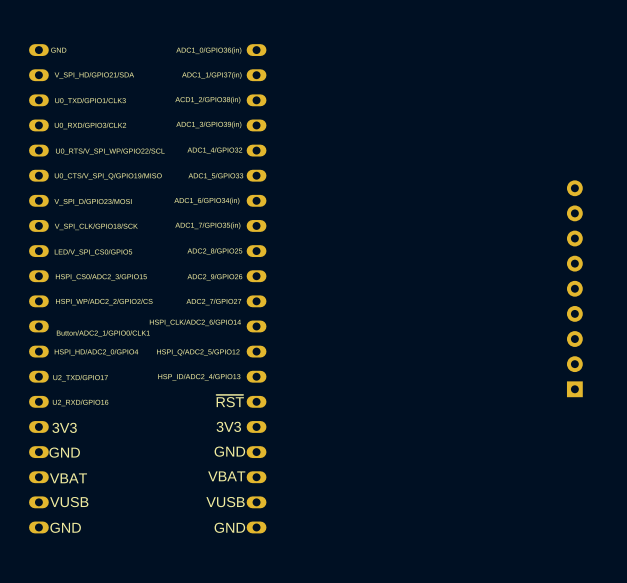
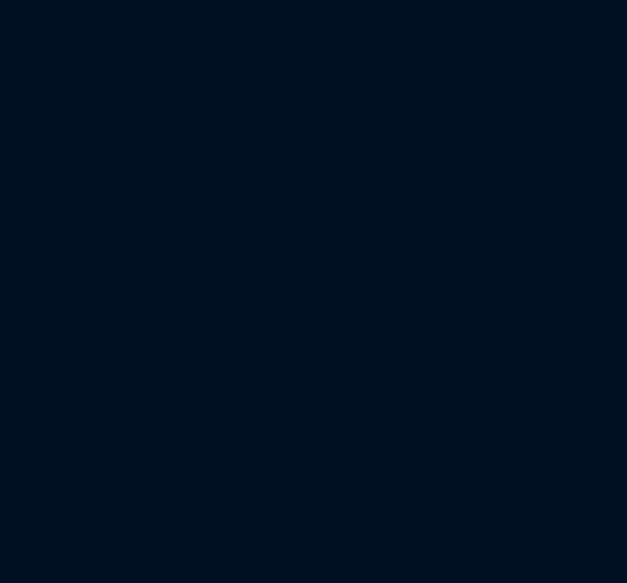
part: (147, 288) -> none
part: (574, 288) -> none

